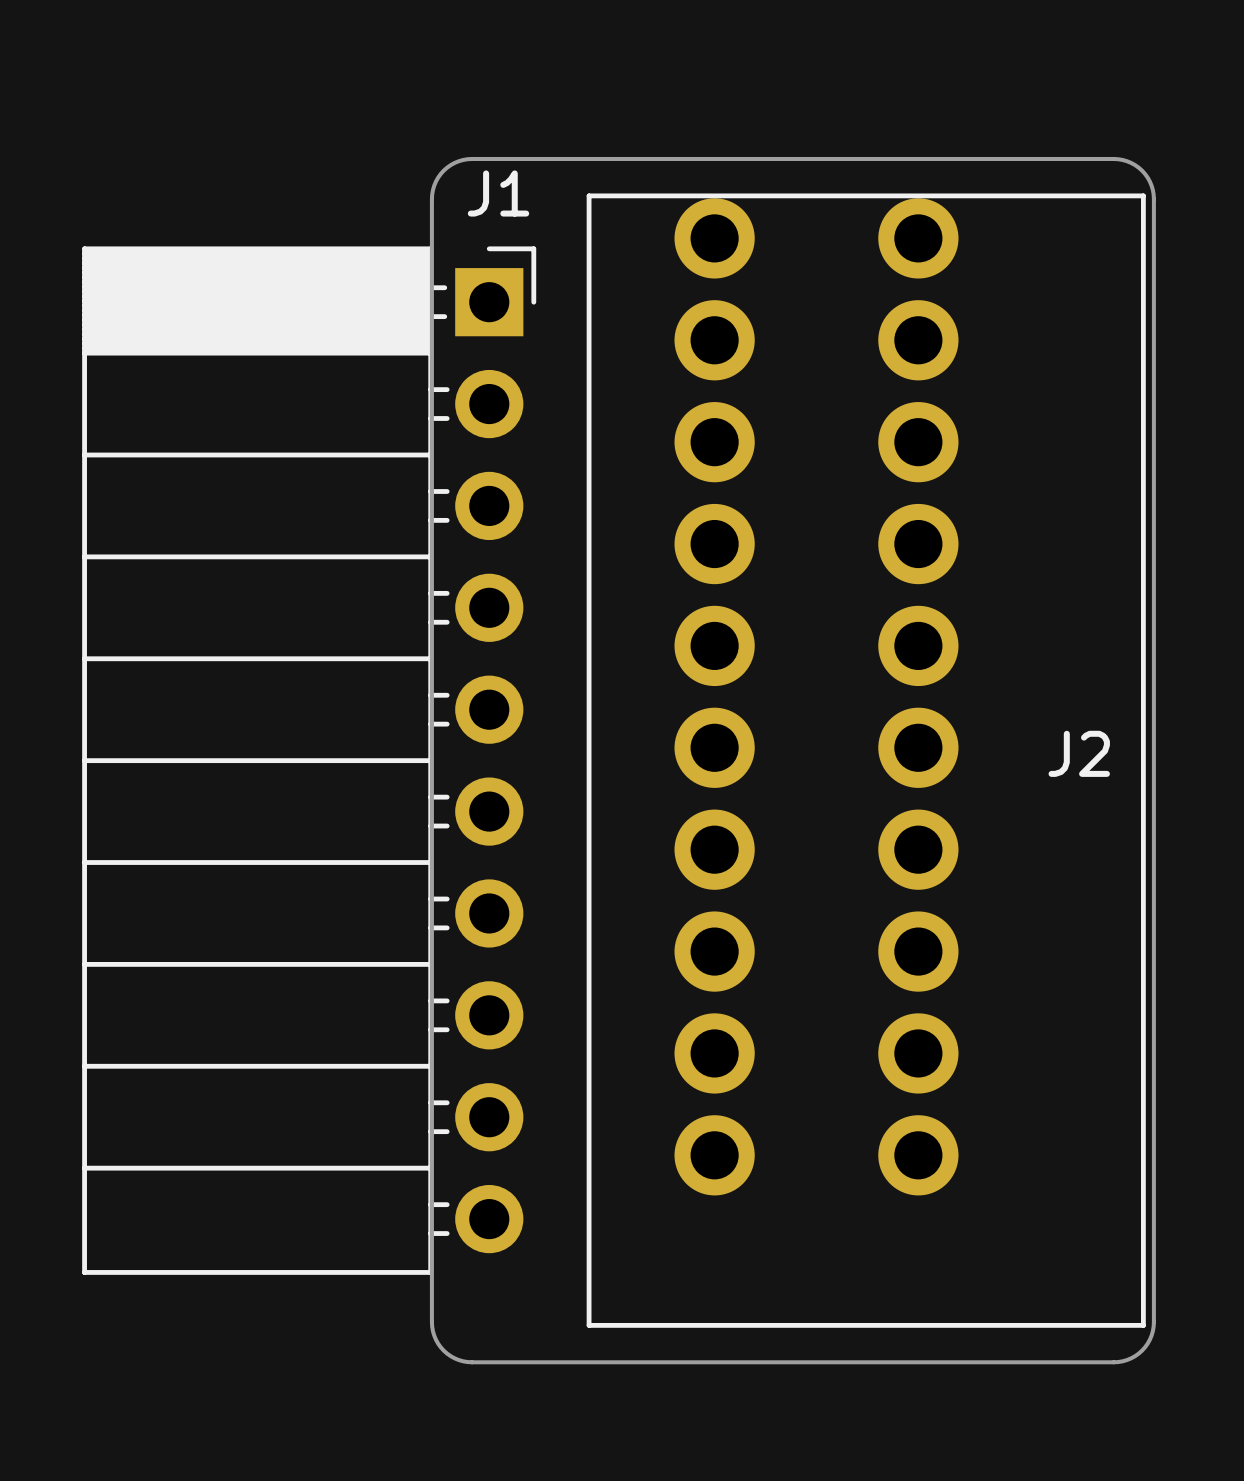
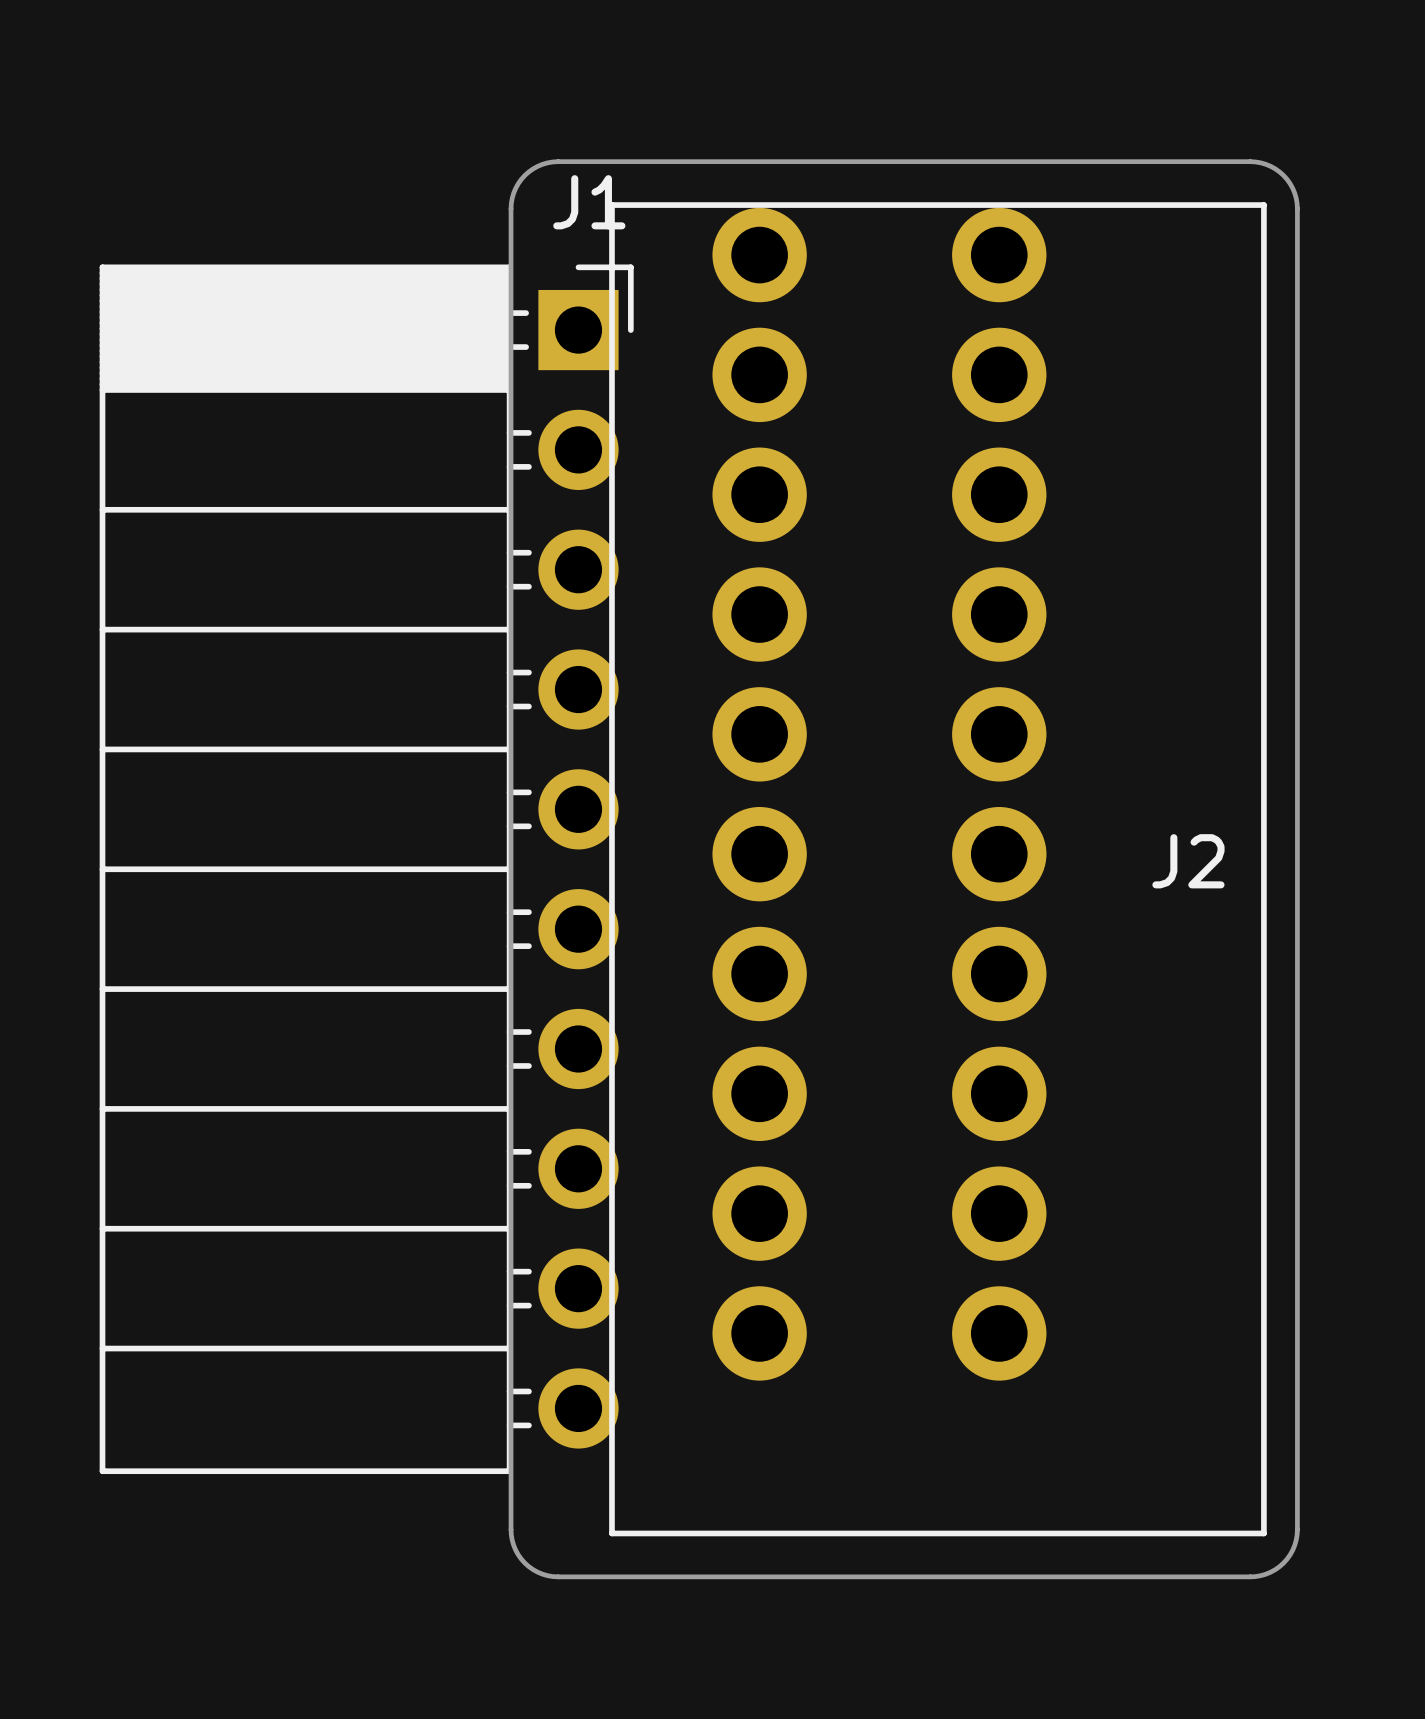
board edge: (1060, 158) (1113, 158) (1131, 162) (1138, 167) (1147, 177) (1152, 190) (1153, 199) (1153, 1326) (1151, 1335) (1145, 1347) (1138, 1353) (1127, 1360) (1113, 1362) (1060, 1362) -> (1250, 161) (1265, 164) (1283, 175) (1294, 193) (1297, 208) (1297, 1529) (1292, 1550) (1283, 1563) (1265, 1574) (1250, 1576)
J2 position: (866, 760) -> (937, 869)

